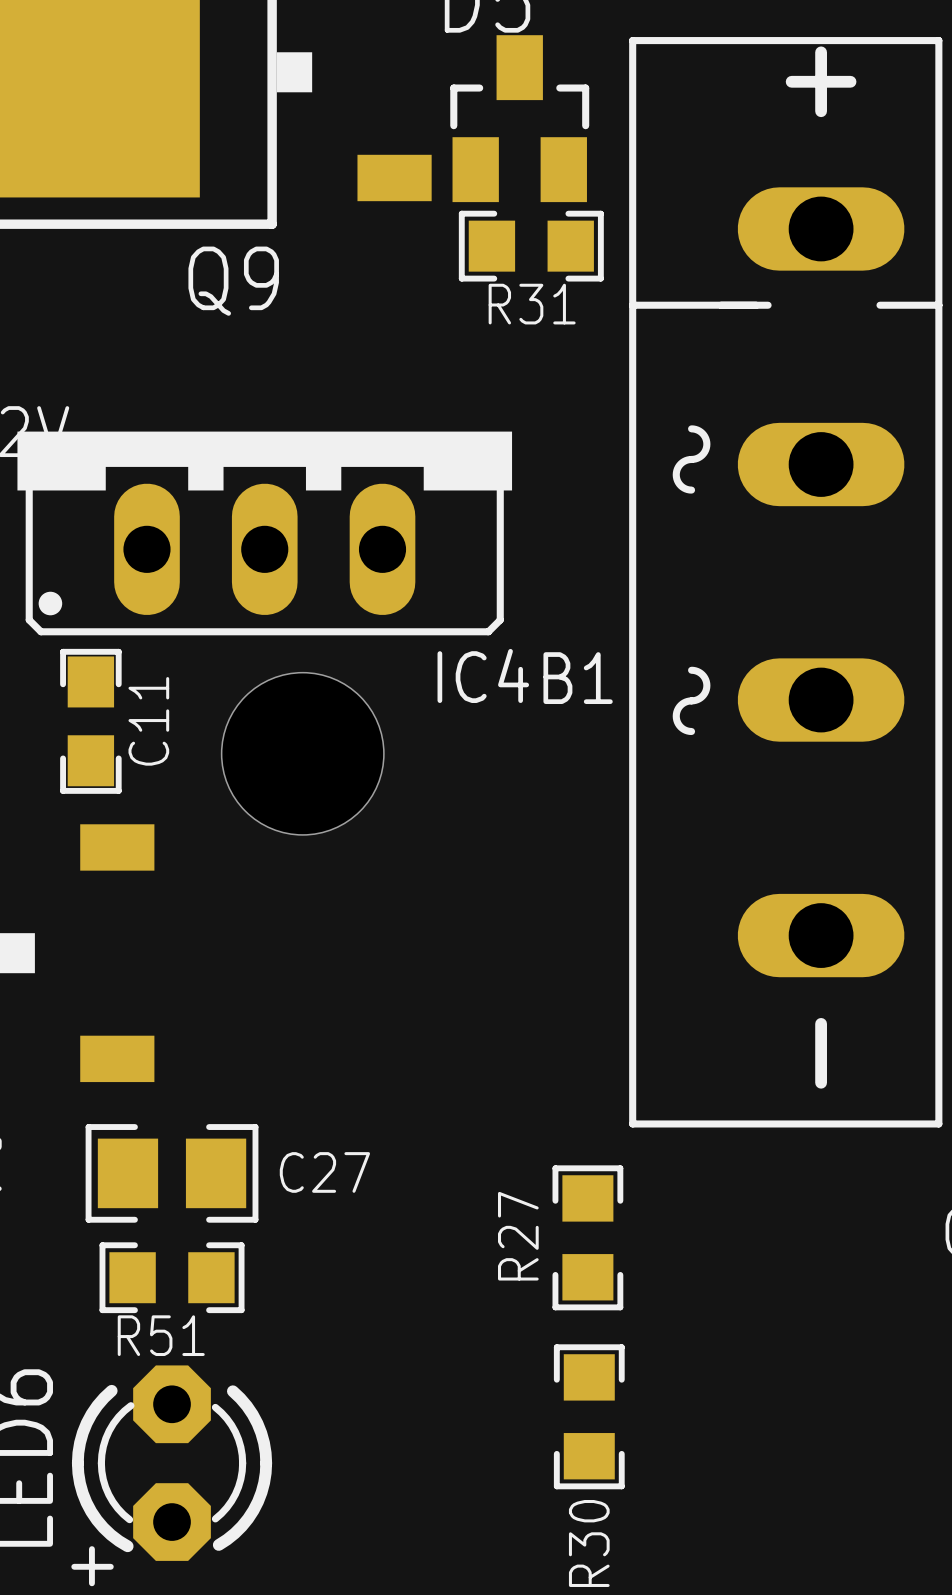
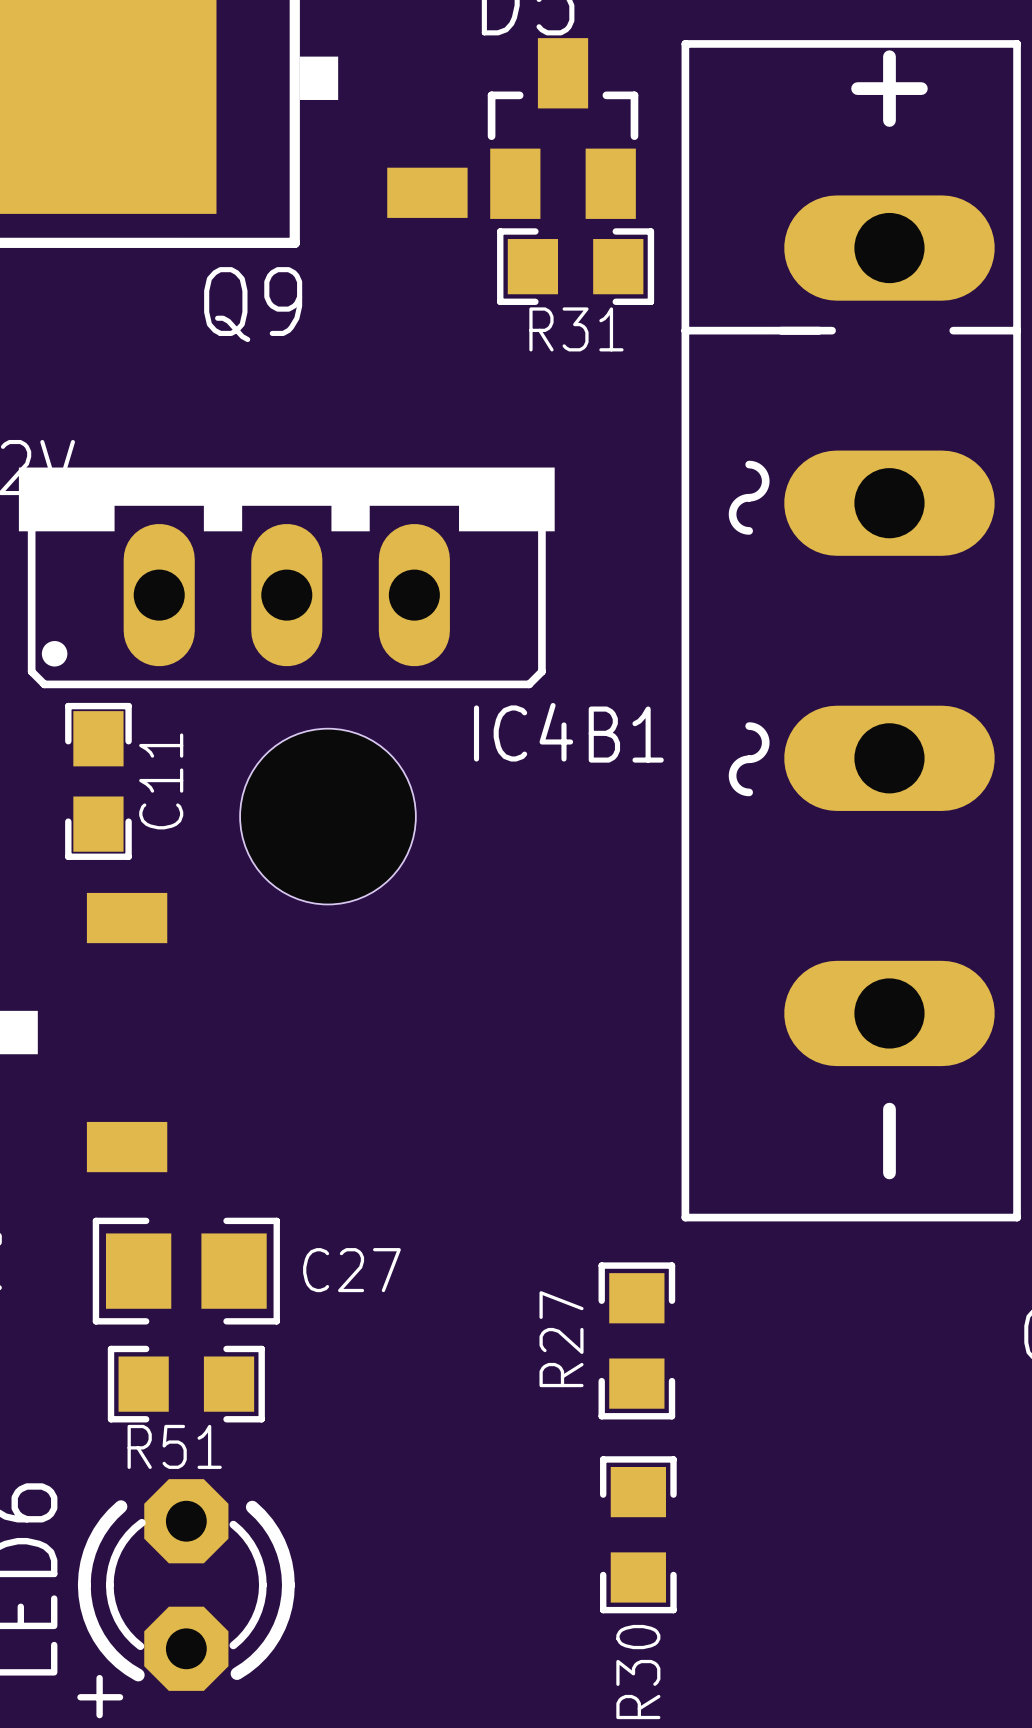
B1 footprint: [629, 37, 943, 1128] -> [681, 40, 1021, 1222]

